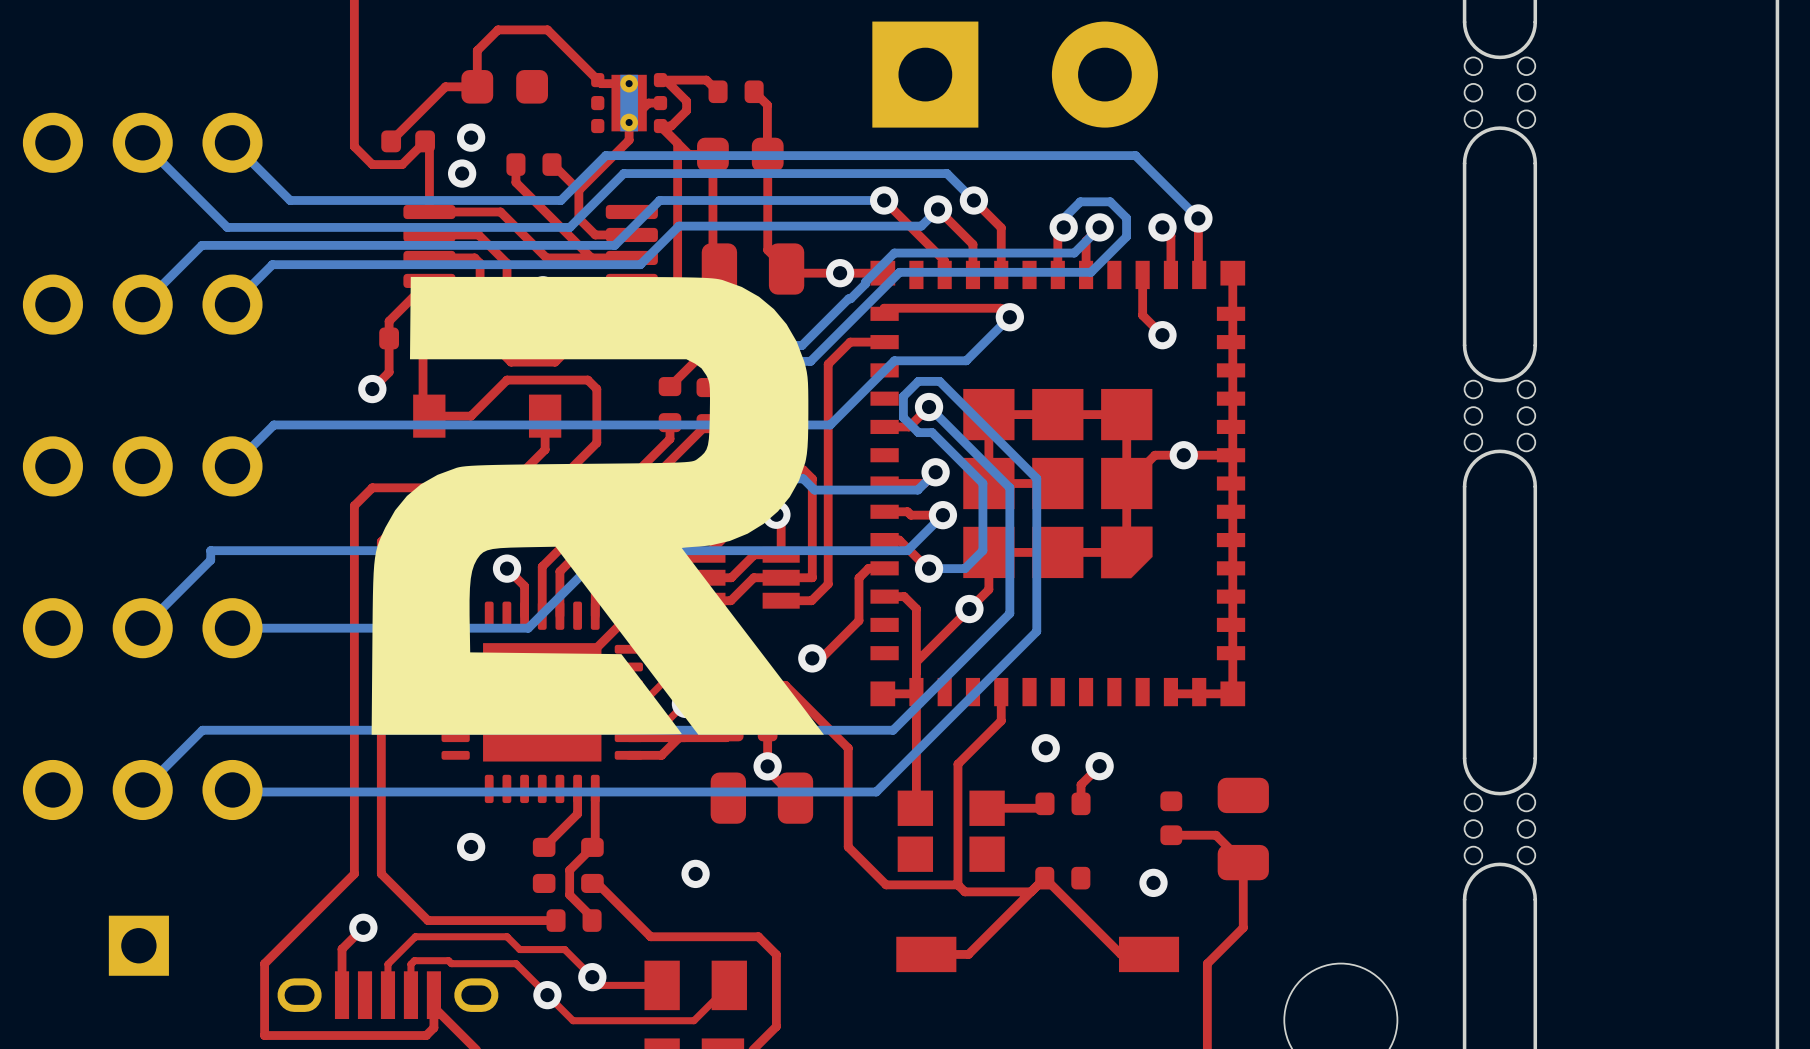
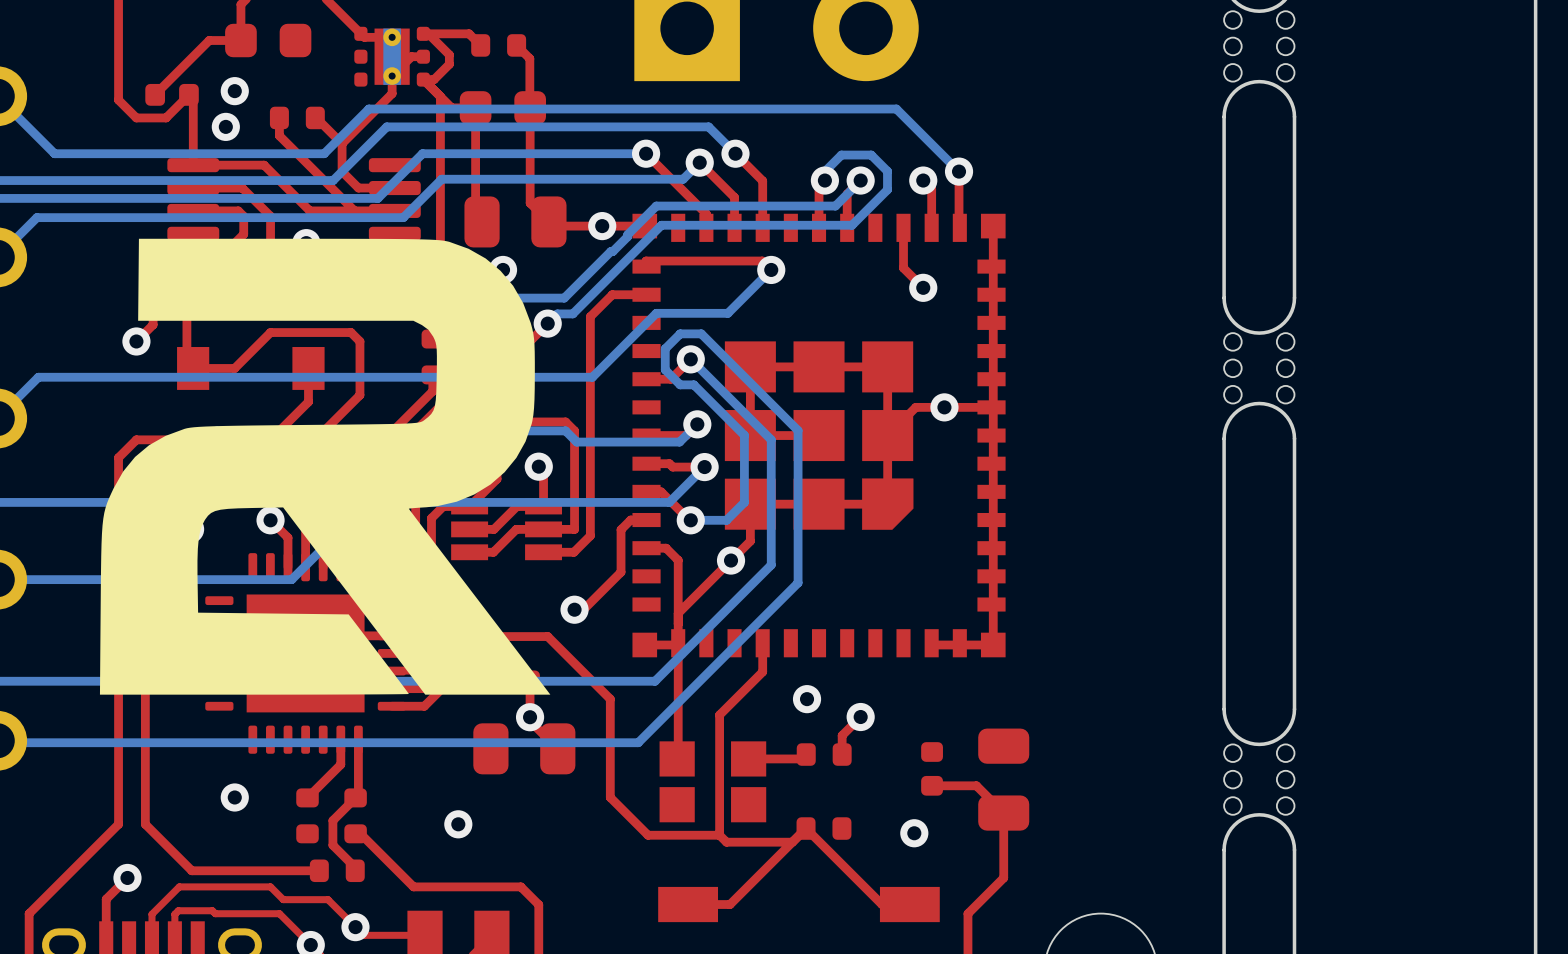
drawing position: (597, 505) -> (325, 466)

